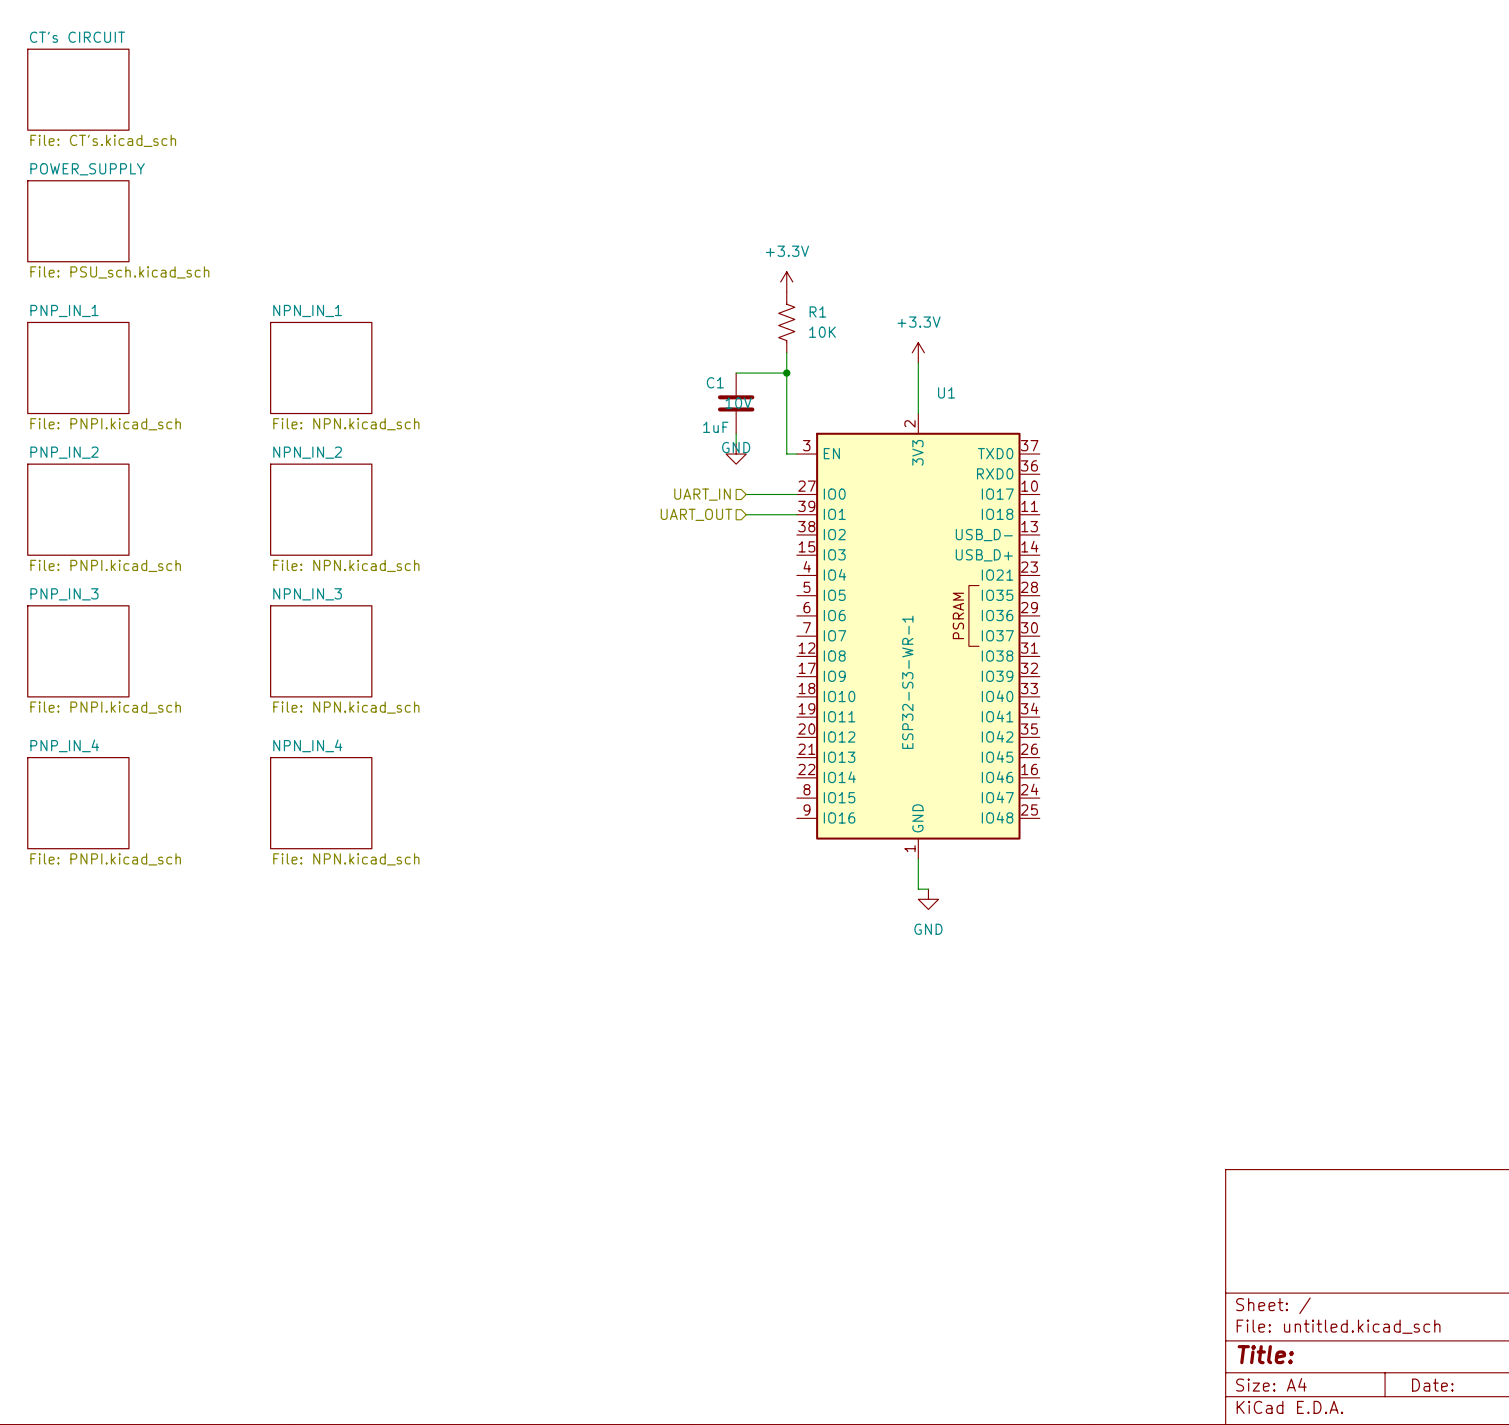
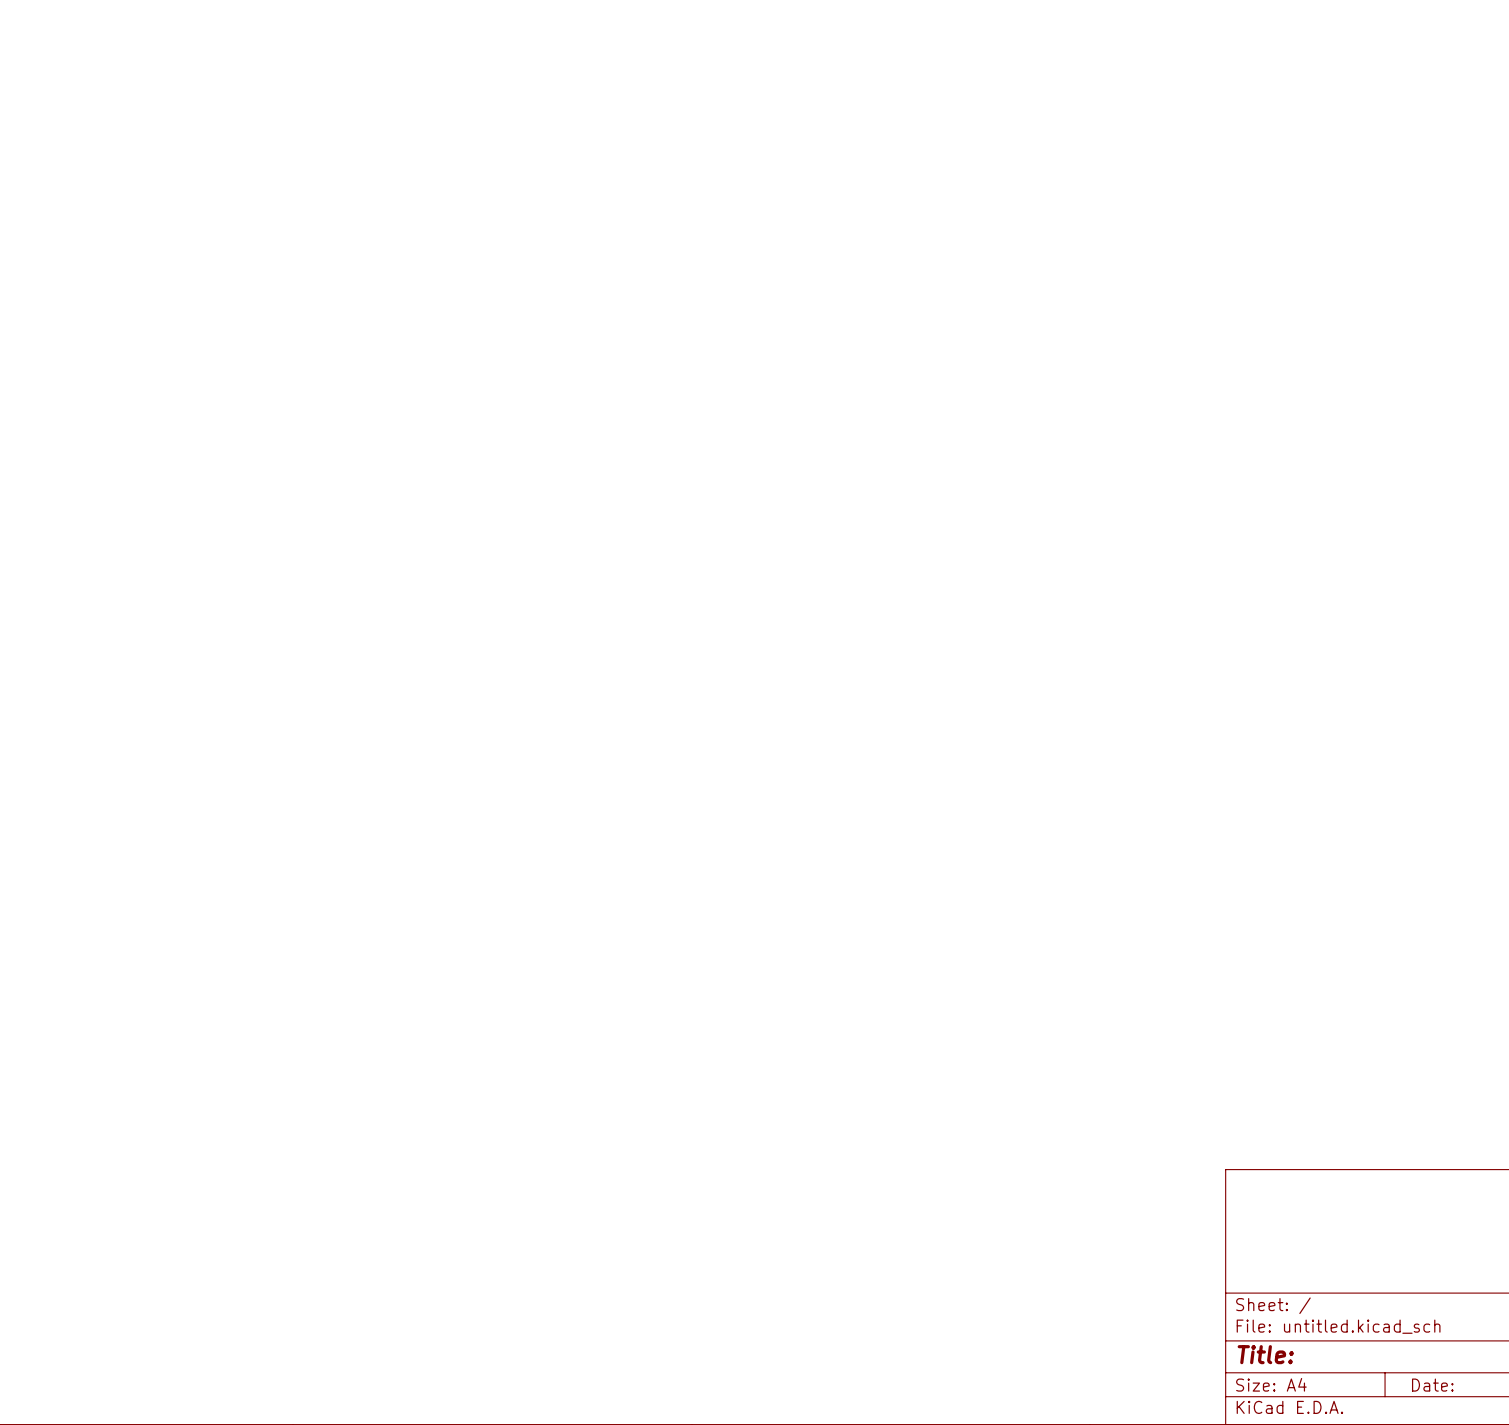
sheet CT's CIRCUIT: File: CT's.kicad_sch (78, 89) -> none
sheet POWER_SUPPLY: File: PSU_sch.kicad_sch (78, 221) -> none
power symbol: +3.3V (786, 281) -> none
R1: 10K (786, 322) -> none
wire: (786, 352) (786, 454) (796, 454) -> none
power symbol: +3.3V (918, 352) -> none
wire: (918, 362) (918, 413) -> none
sheet PNP_IN_1: File: PNPI.kicad_sch (78, 367) -> none
sheet NPN_IN_1: File: NPN.kicad_sch (321, 367) -> none
wire: (736, 373) (786, 373) -> none
junction: (786, 373) -> none
C1: 1uF (736, 403) -> none
wire: (736, 433) (736, 443) -> none
power symbol: GND (736, 454) -> none
hierarchical label: UART_IN (702, 494) -> none
wire: (746, 494) (796, 494) -> none
sheet PNP_IN_2: File: PNPI.kicad_sch (78, 509) -> none
sheet NPN_IN_2: File: NPN.kicad_sch (321, 509) -> none
hierarchical label: UART_OUT (696, 514) -> none
wire: (746, 514) (796, 514) -> none
U1: ESP32-S3-WR-1 (918, 636) -> none
sheet PNP_IN_3: File: PNPI.kicad_sch (78, 651) -> none
sheet NPN_IN_3: File: NPN.kicad_sch (321, 651) -> none
sheet PNP_IN_4: File: PNPI.kicad_sch (78, 803) -> none
sheet NPN_IN_4: File: NPN.kicad_sch (321, 803) -> none
wire: (918, 858) (918, 889) (928, 889) -> none
power symbol: GND (928, 899) -> none

